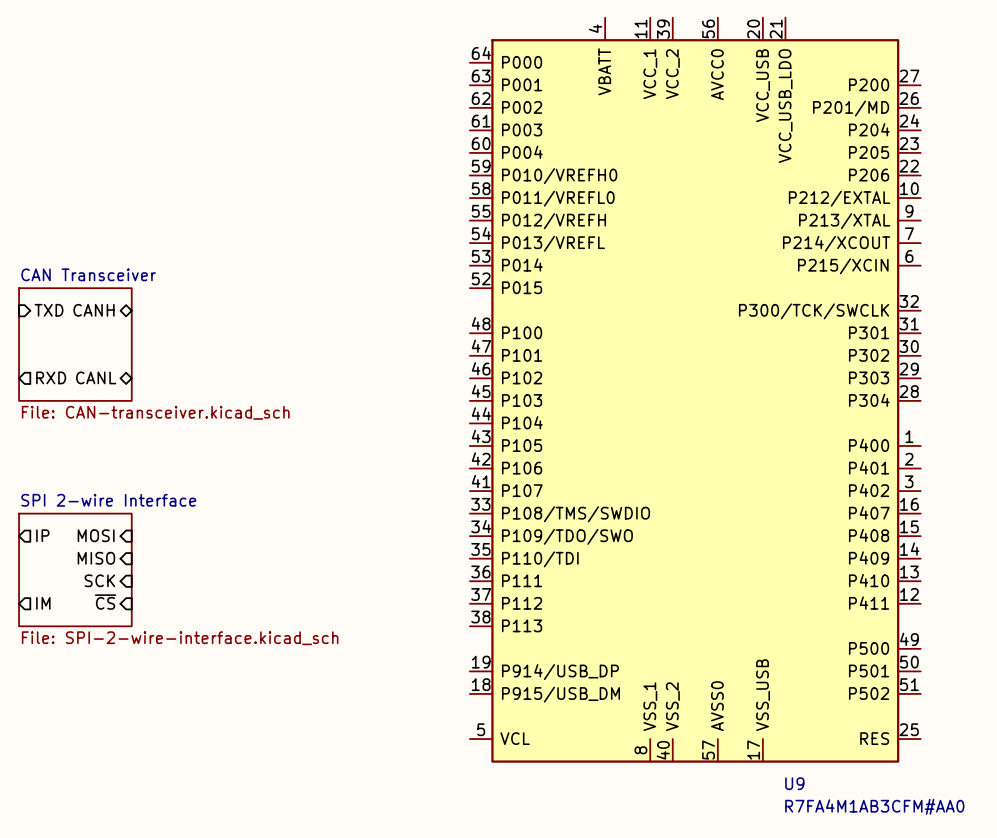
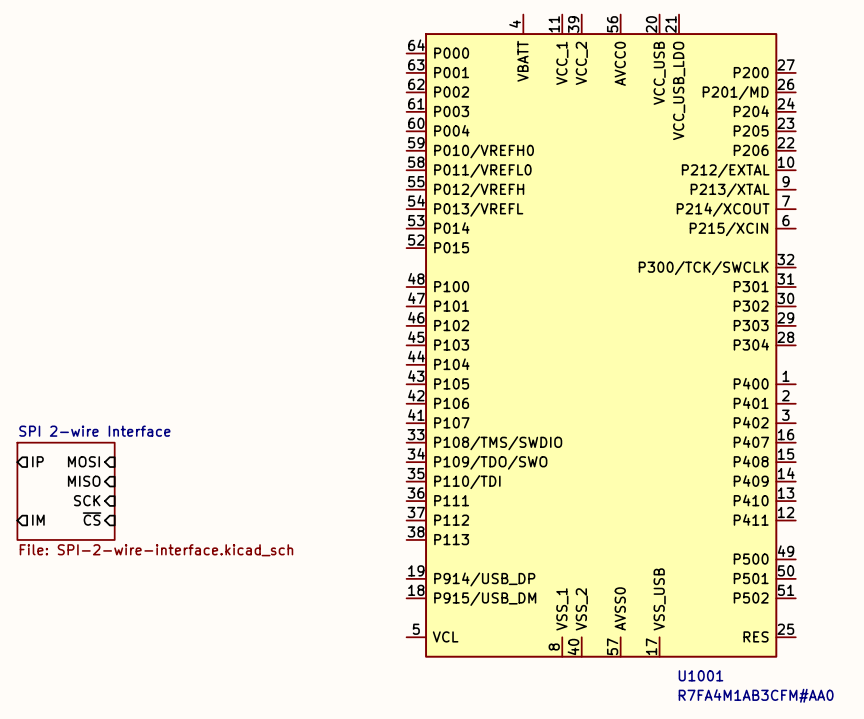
sheet pin: TXD (49, 310) -> none
sheet pin: CANH (94, 310) -> none
sheet CAN Transceiver: File: CAN-transceiver.kicad_sch (75, 344) -> none
sheet pin: RXD (51, 377) -> none
sheet pin: CANL (96, 377) -> none
U9 name: U9 (794, 783) -> U1001 (700, 675)

